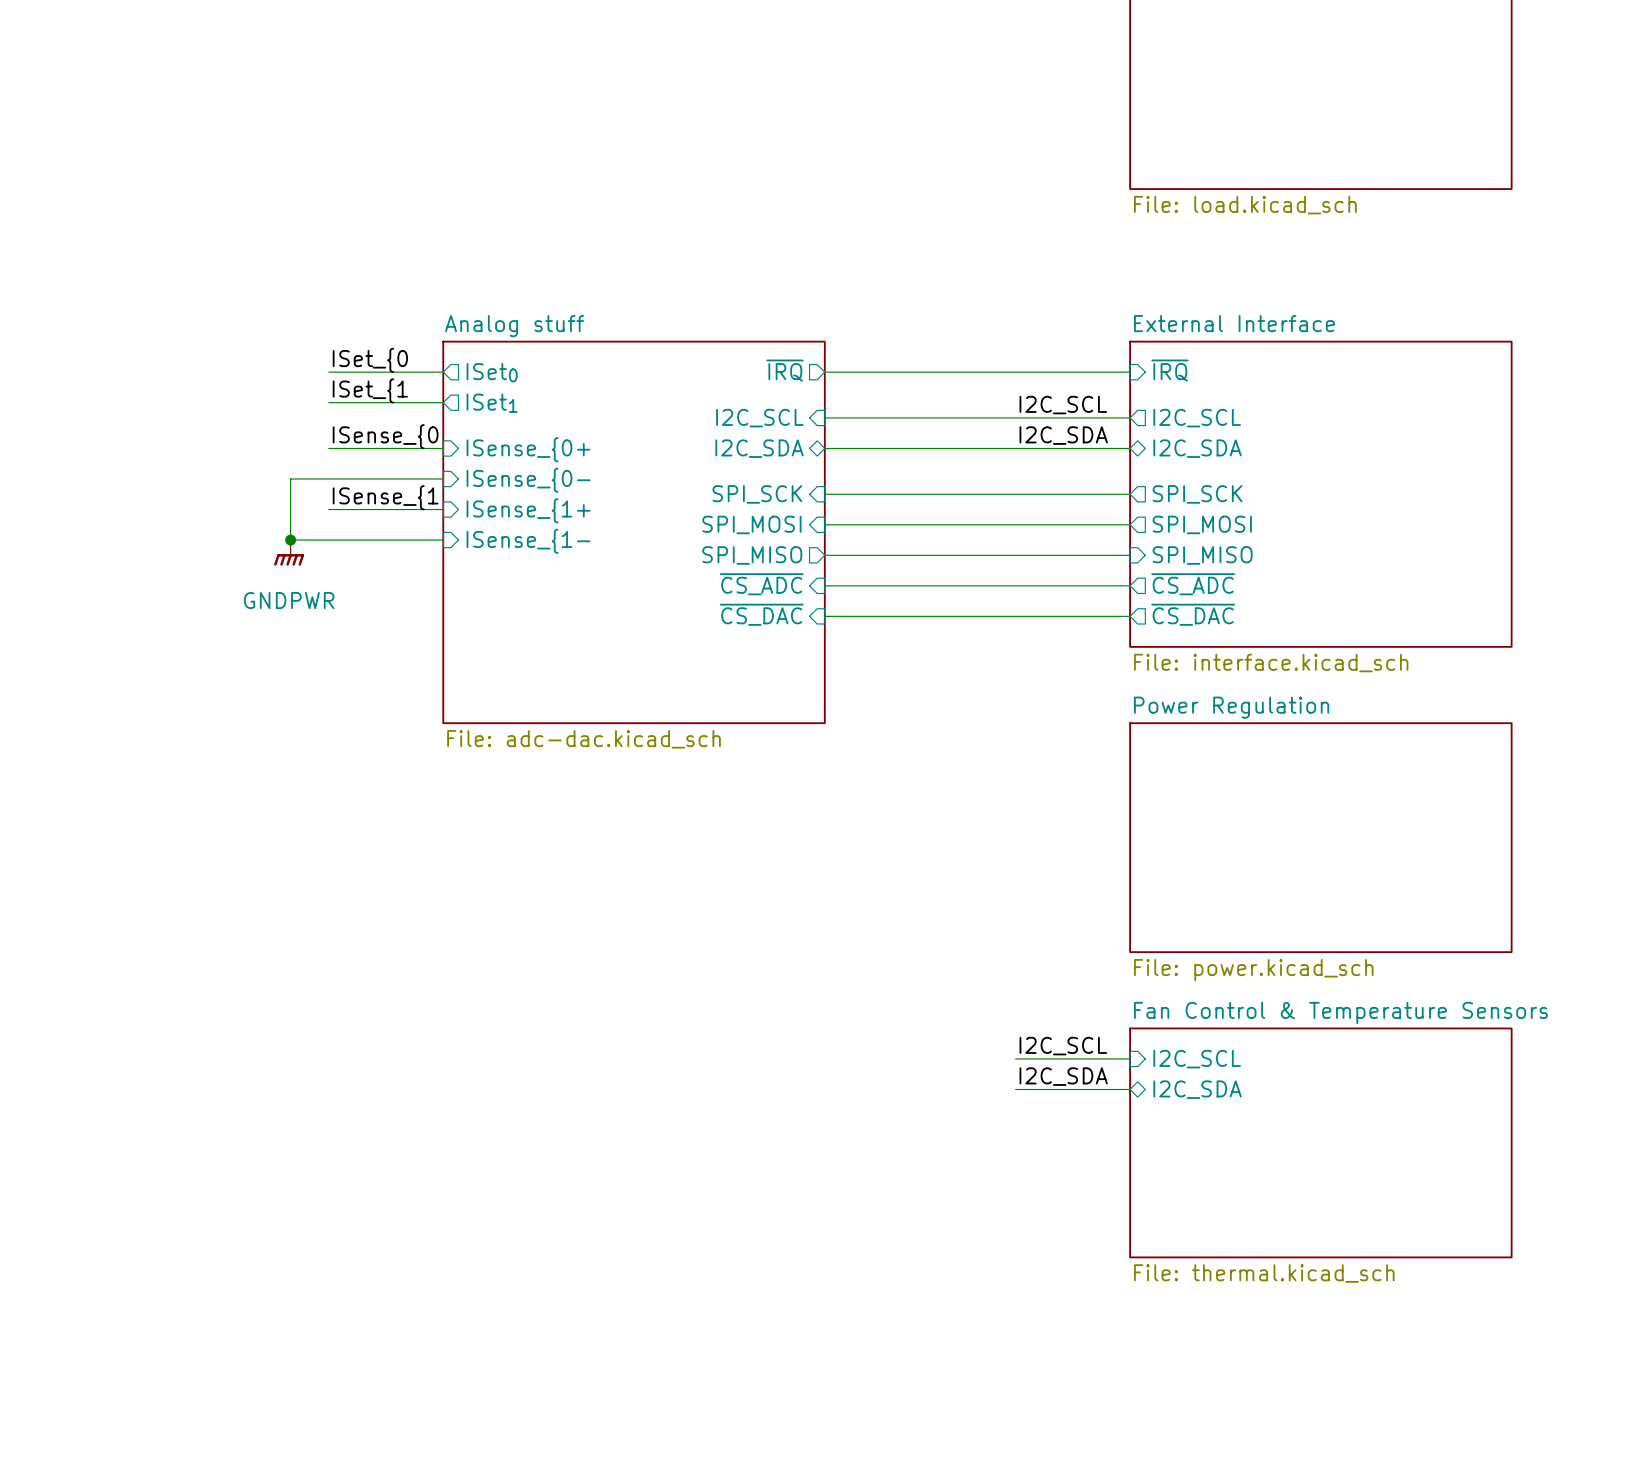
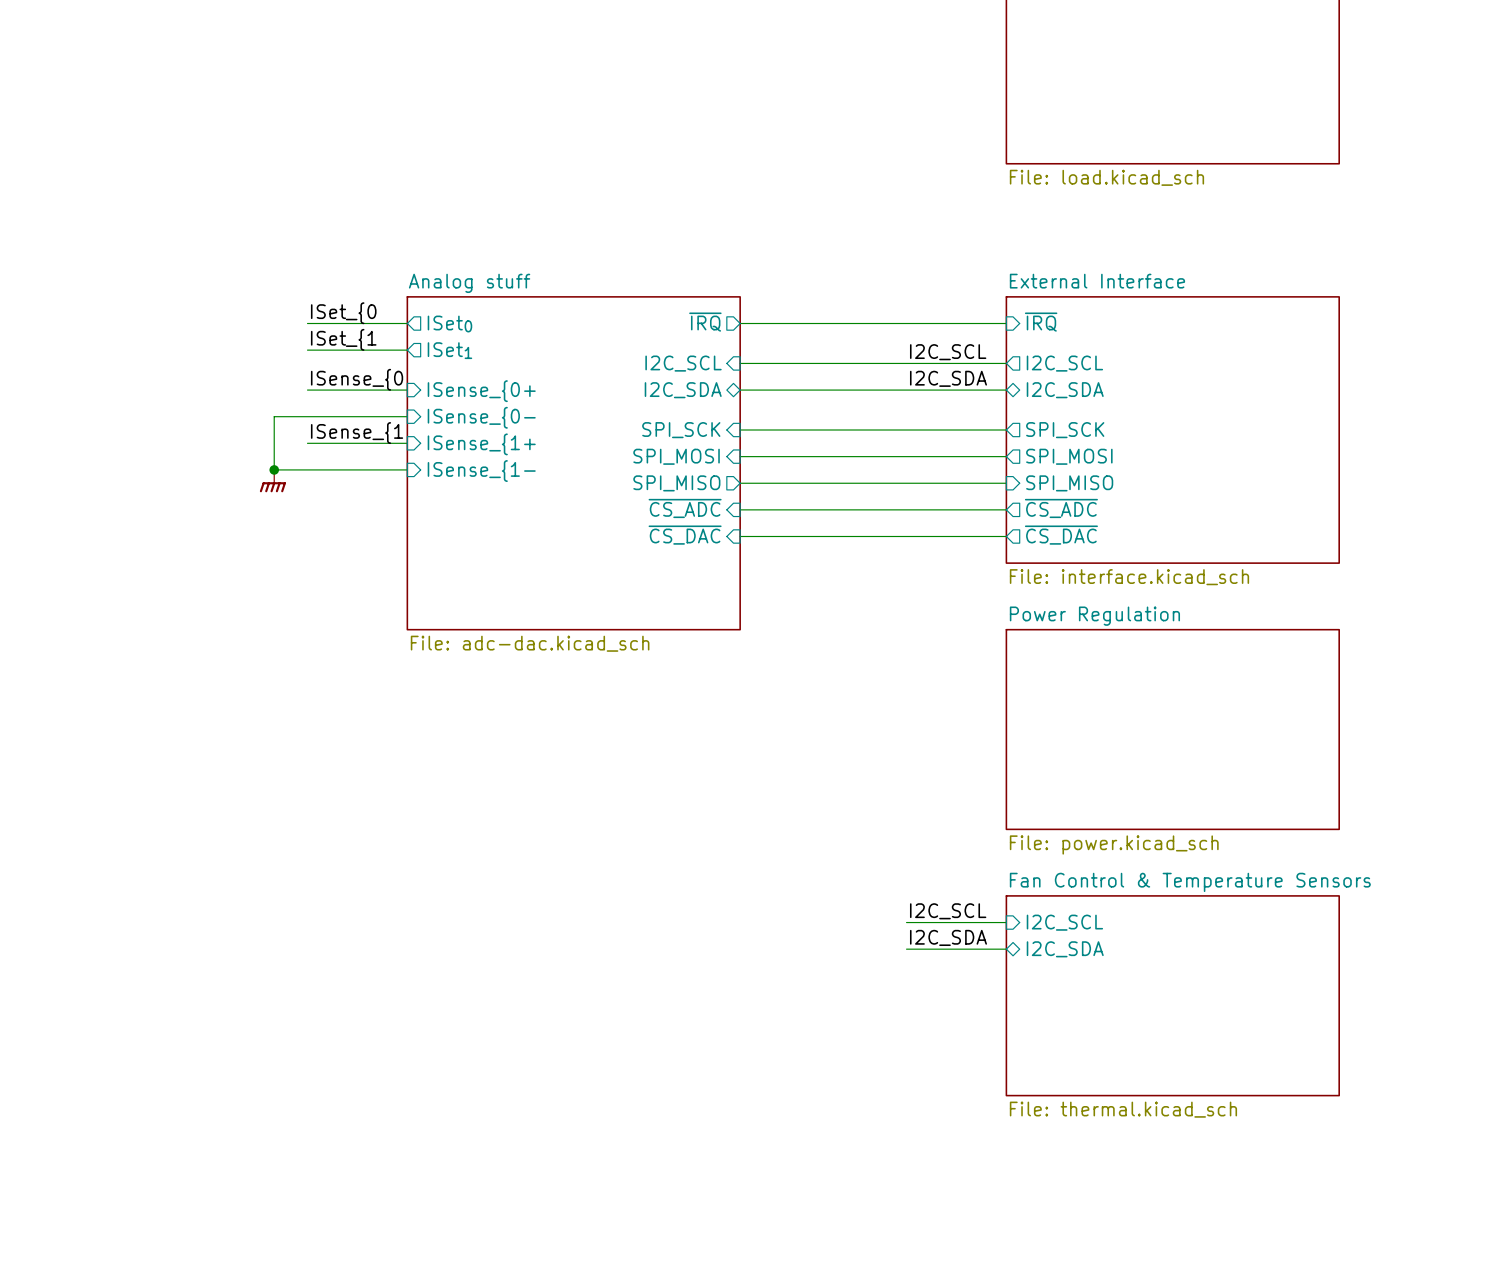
power symbol text: GNDPWR (289, 600) -> none

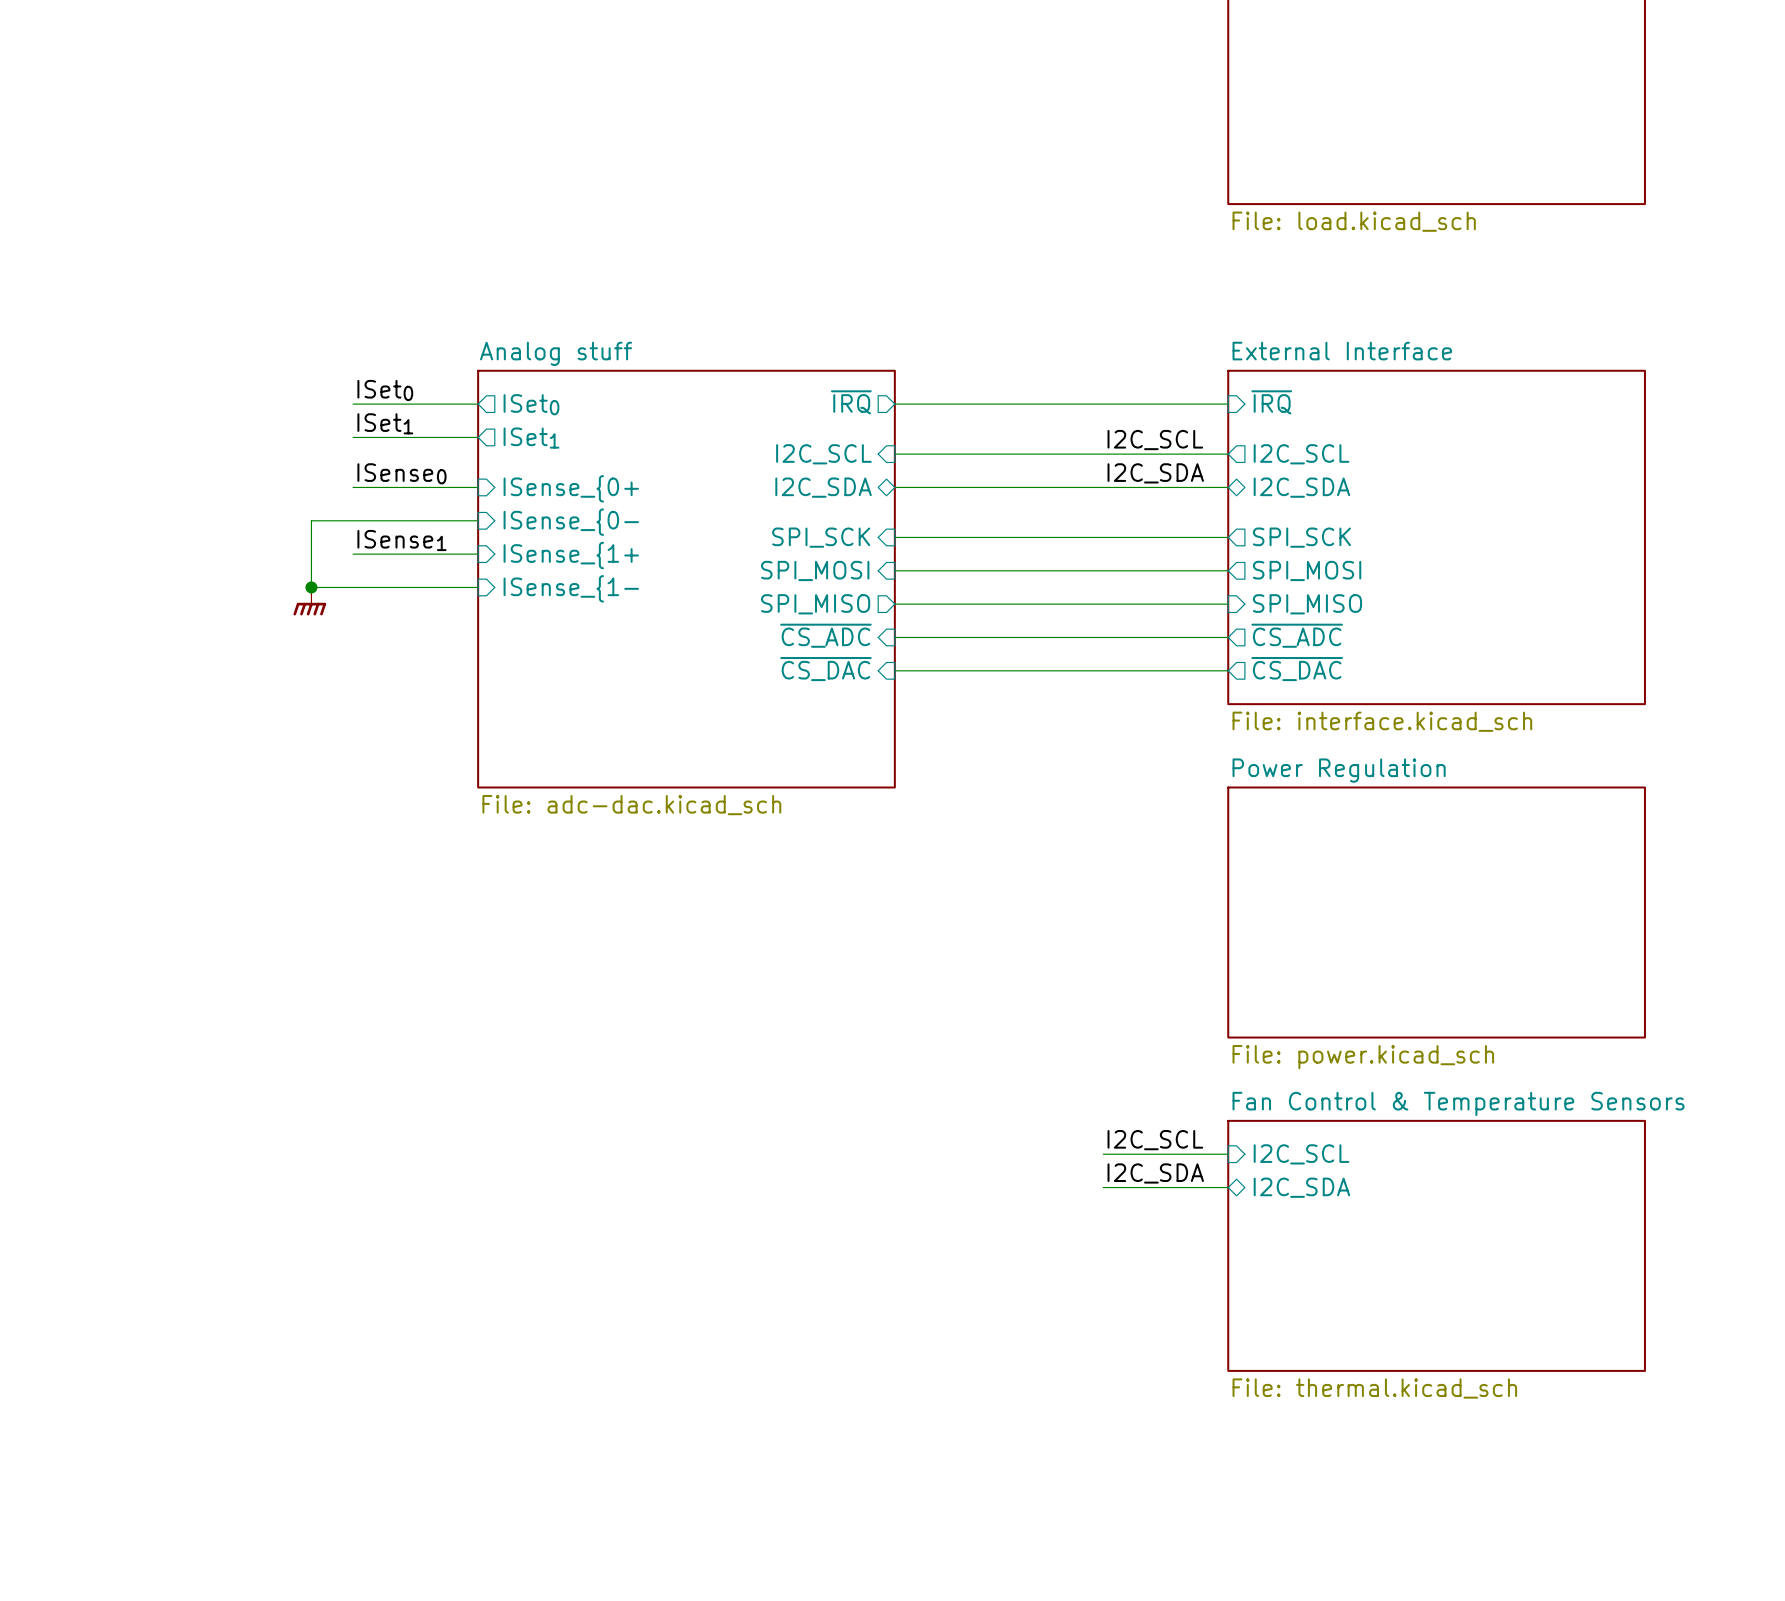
label: ISet_{0 (343, 313) -> ISet0 (385, 390)
label: ISet_{1 (343, 339) -> ISet1 (385, 423)
label: ISense_{0 (357, 379) -> ISense0 (401, 473)
label: ISense_{1 (357, 433) -> ISense1 (401, 540)

